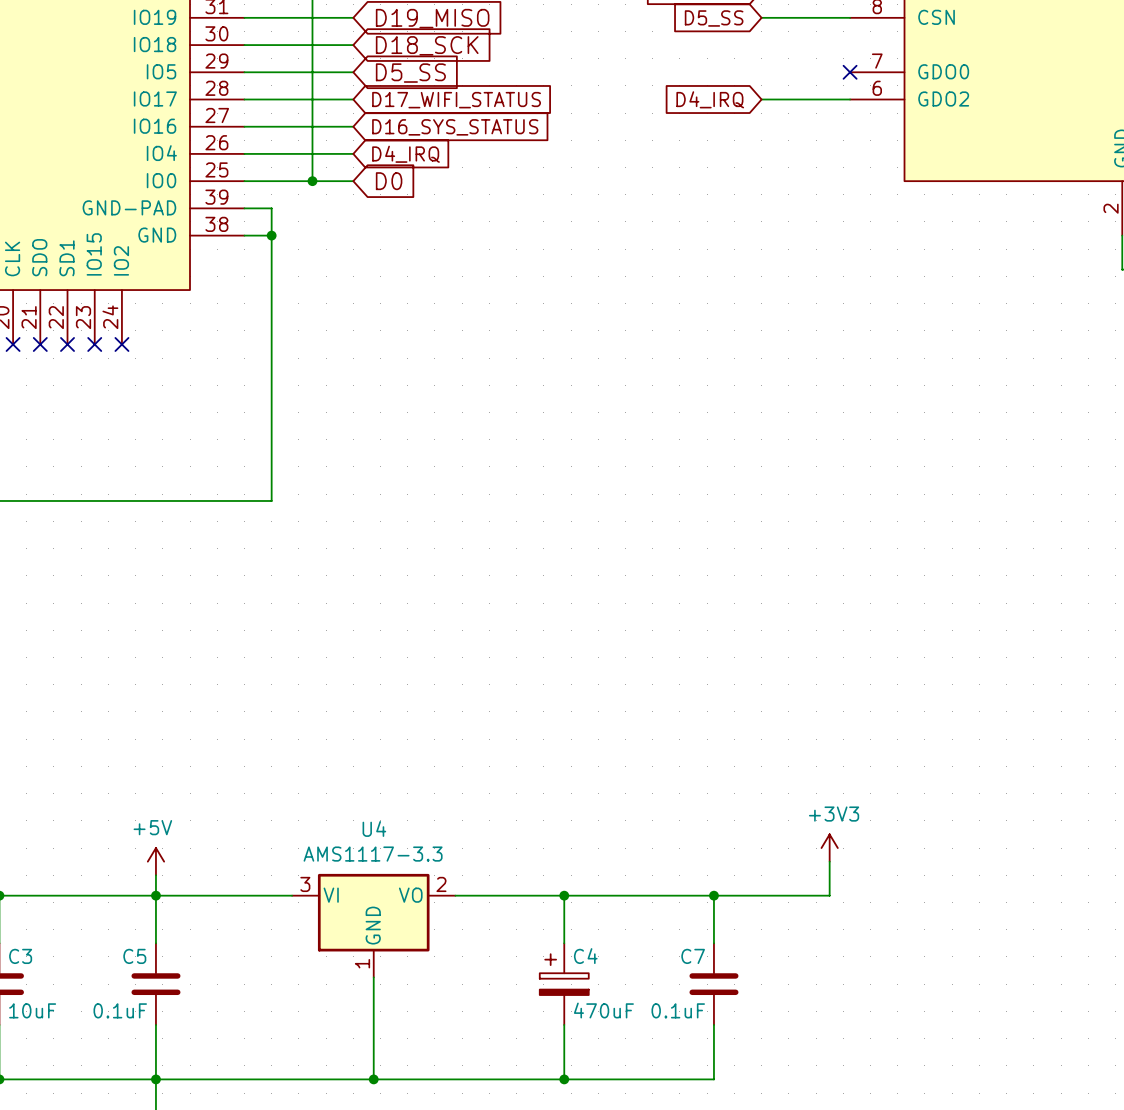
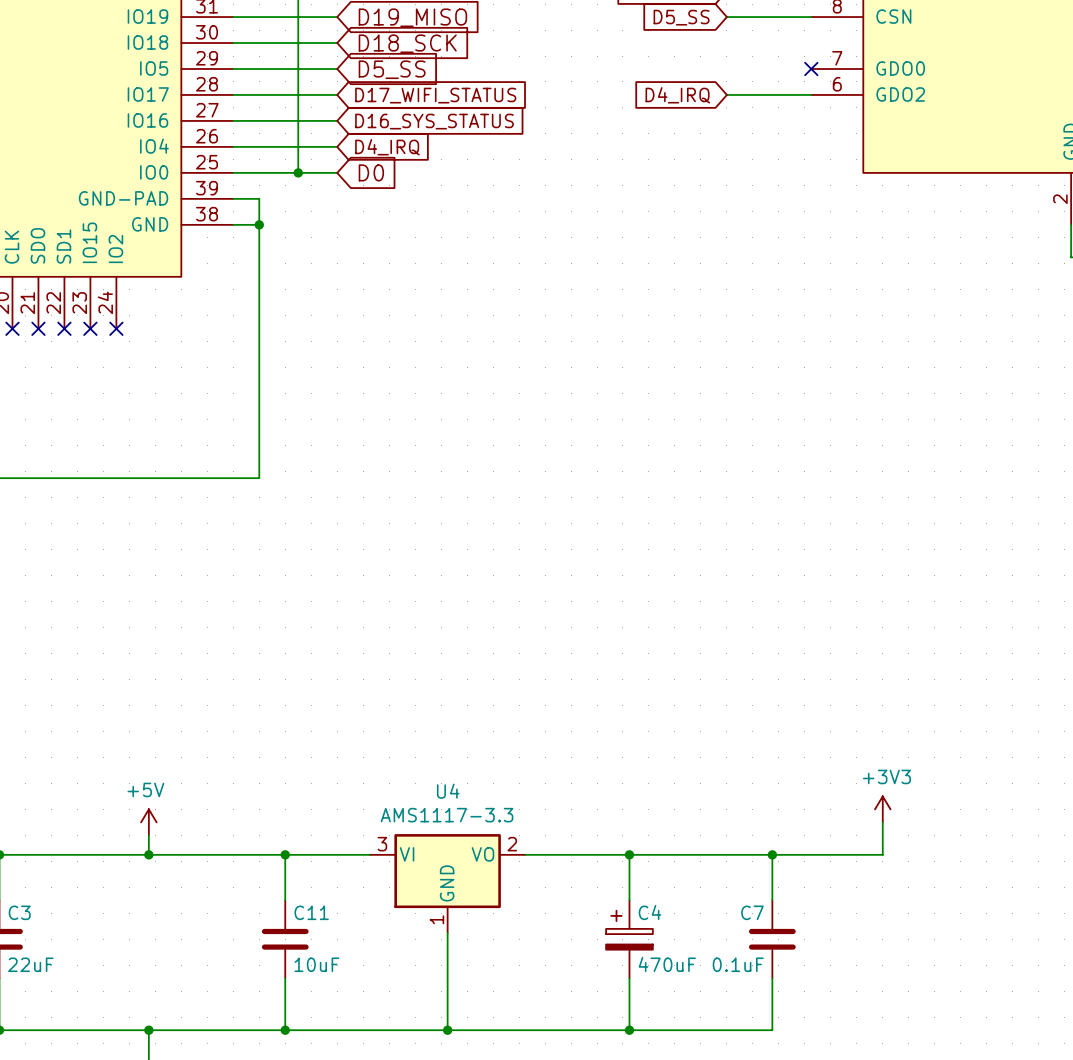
power symbol position: +3V3 (829, 848) -> +3V3 (882, 809)
wire: (829, 861) (829, 895) -> (882, 822) (882, 854) (791, 854)
wire: (155, 895) (155, 943) -> (285, 854) (285, 900)
junction: none -> (285, 854)
wire: (564, 895) (564, 943) -> (629, 854) (629, 900)
junction: (564, 895) -> none
junction: none -> (629, 854)
wire: (713, 895) (713, 943) -> (772, 854) (772, 900)
junction: (713, 895) -> none
junction: none -> (772, 854)
U4 position: (373, 925) -> (447, 883)
wire: (373, 977) (373, 1079) -> (447, 932) (447, 1030)
C5: 0.1uF (155, 984) -> none
C11: none -> 10uF (285, 939)
C4 position: (564, 984) -> (629, 939)
C7 position: (713, 984) -> (772, 939)
C3 value: 10uF (32, 1010) -> 22uF (30, 964)
wire: (155, 1024) (155, 1079) -> (285, 978) (285, 1030)
wire: (564, 1024) (564, 1079) -> (629, 978) (629, 1030)
wire: (713, 1024) (713, 1079) -> (772, 978) (772, 1030) (681, 1030)
junction: none -> (285, 1030)
junction: (373, 1079) -> none
junction: none -> (447, 1030)
junction: (564, 1079) -> none
junction: none -> (629, 1030)

